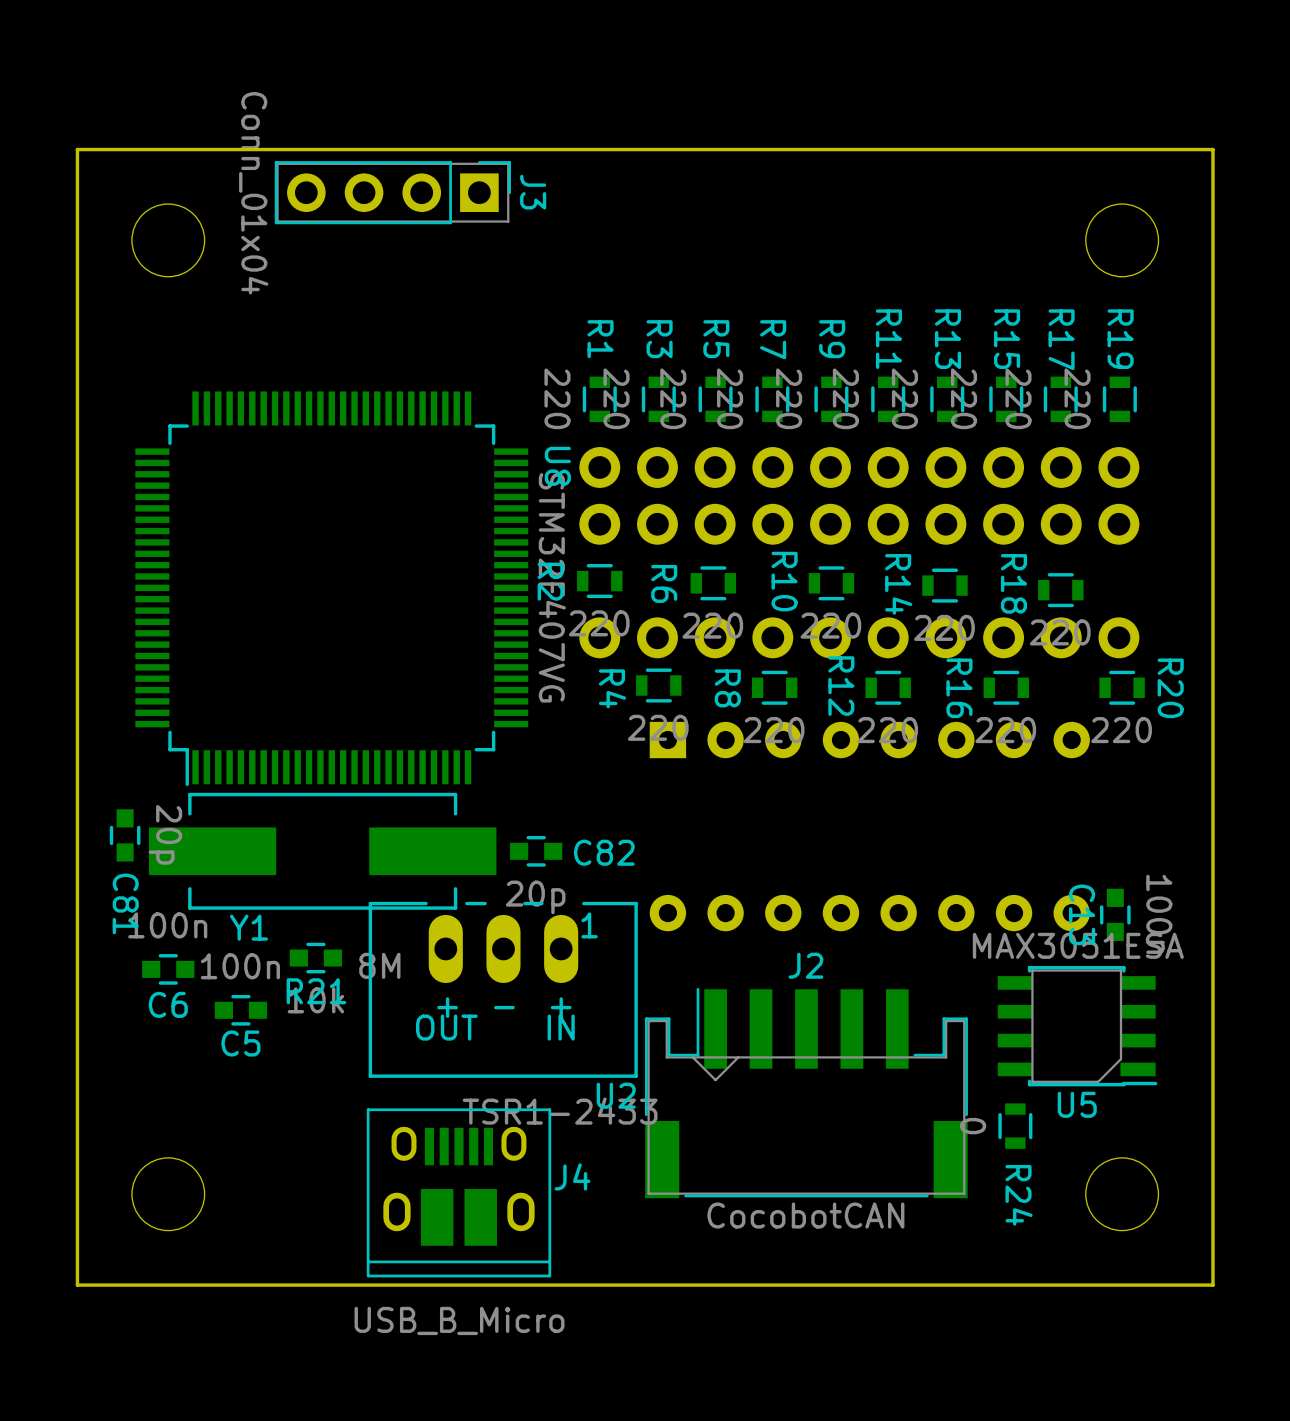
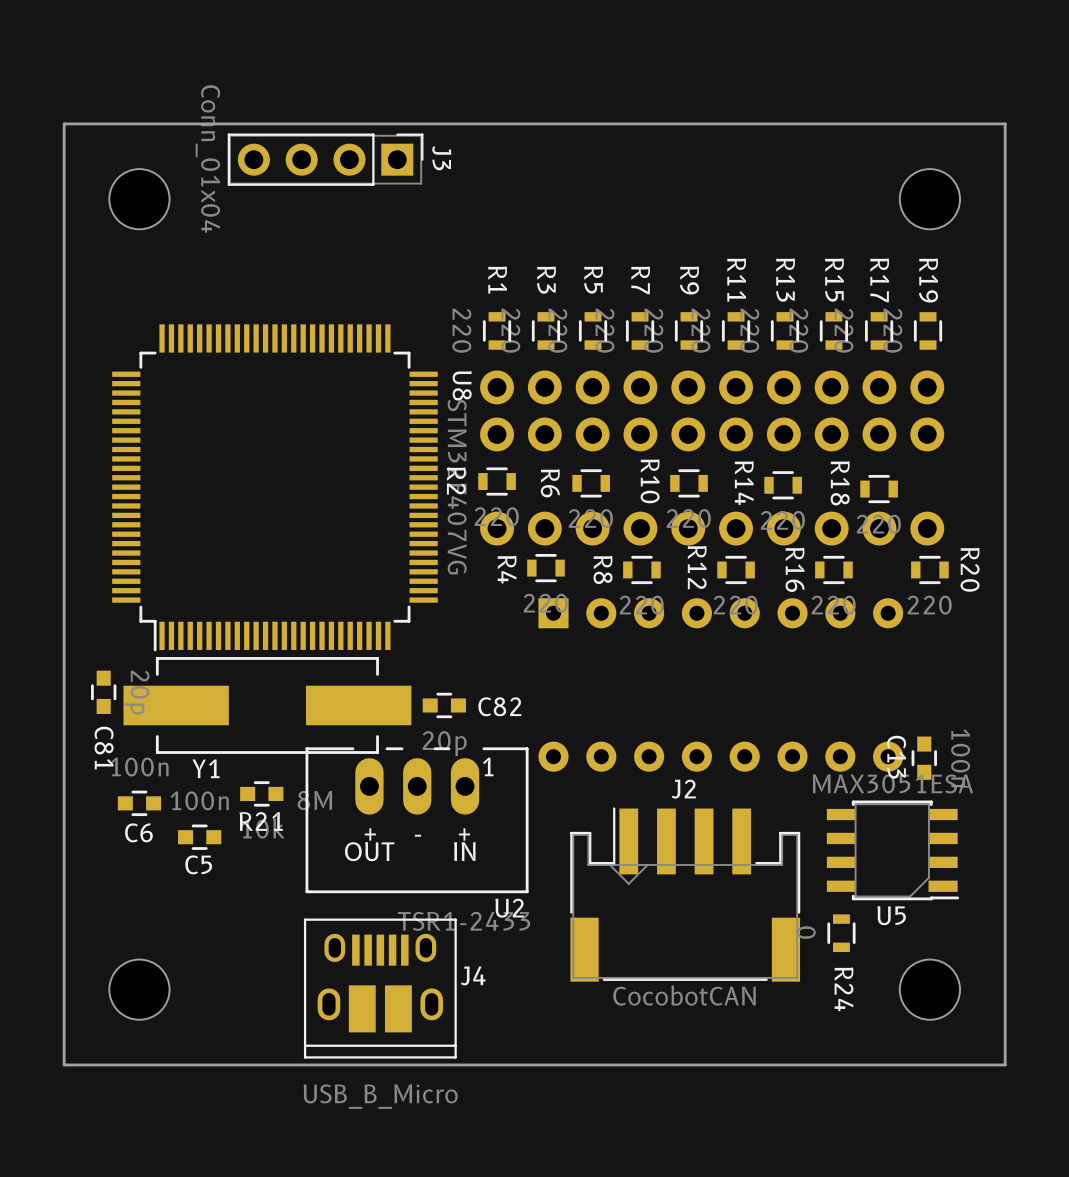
J2 footprint: [644, 987, 968, 1199] -> [570, 807, 801, 982]

